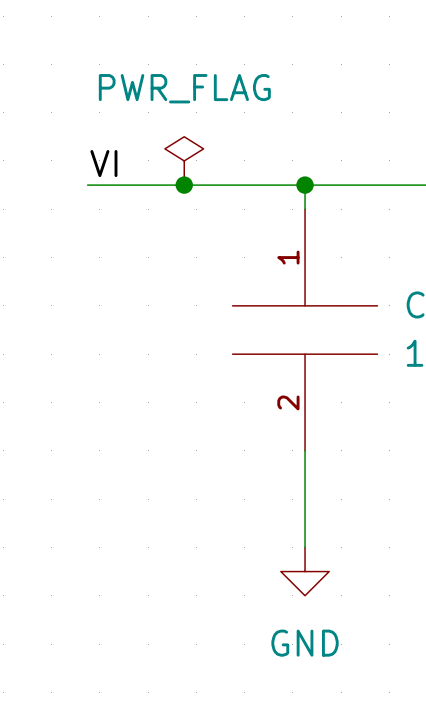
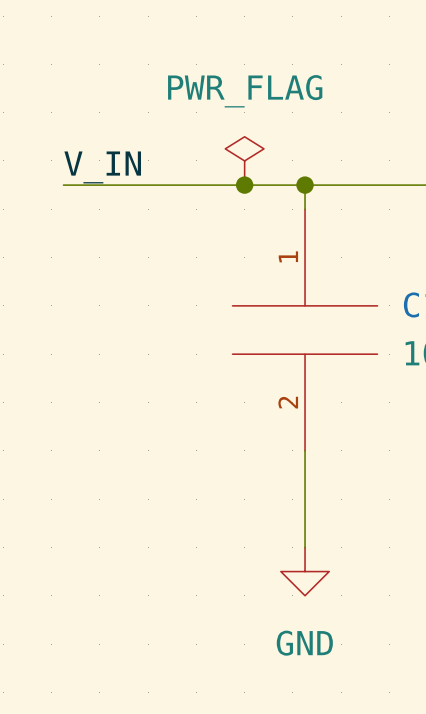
power symbol position: PWR_FLAG (184, 160) -> PWR_FLAG (244, 160)
label: VI (103, 163) -> V_IN (102, 167)
wire: none -> (63, 185) (87, 185)
junction position: (184, 185) -> (244, 185)

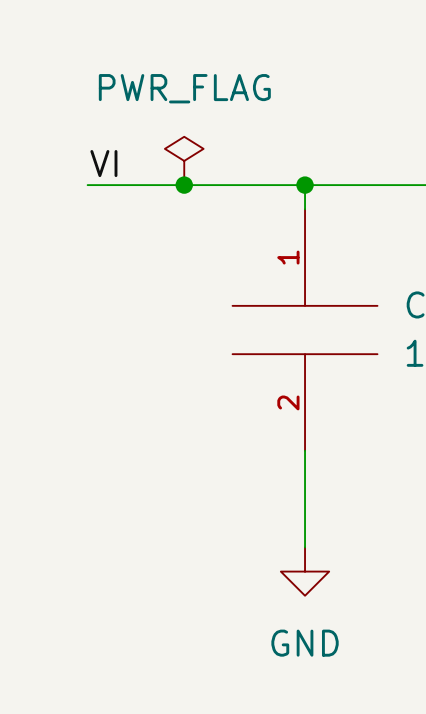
power symbol position: PWR_FLAG (244, 160) -> PWR_FLAG (184, 160)
label: V_IN (102, 167) -> VI (103, 163)
wire: (63, 185) (87, 185) -> none
junction position: (244, 185) -> (184, 185)

